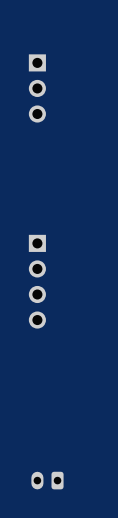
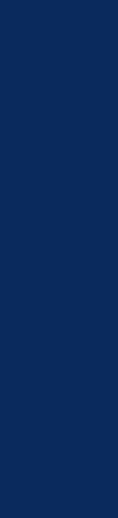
part: (37, 88) -> none
part: (37, 281) -> none
part: (47, 480) -> none

